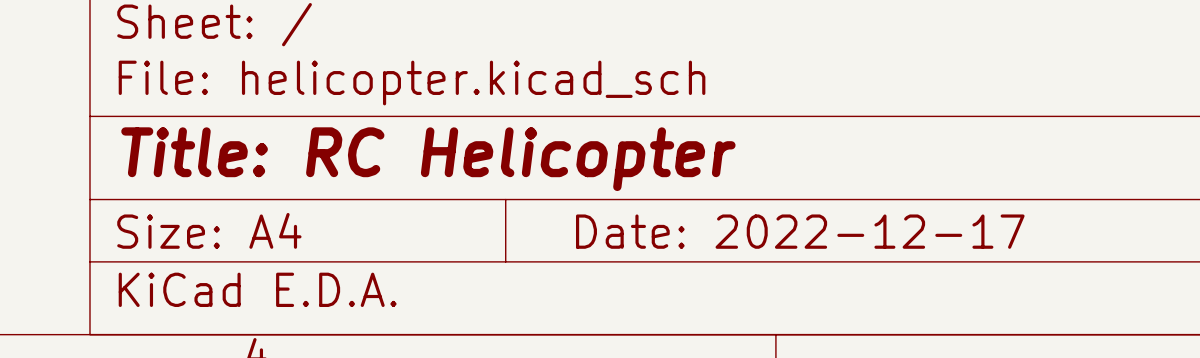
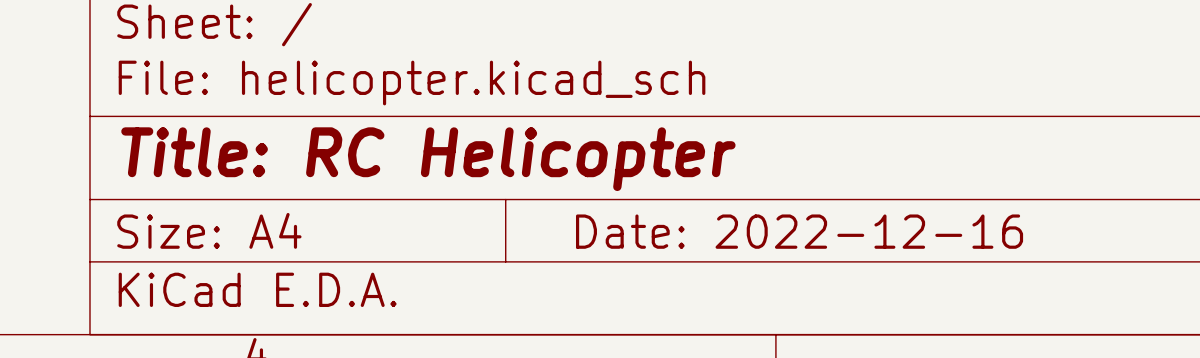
title block: Date: 2022-12-17 (800, 231) -> Date: 2022-12-16 (799, 231)

